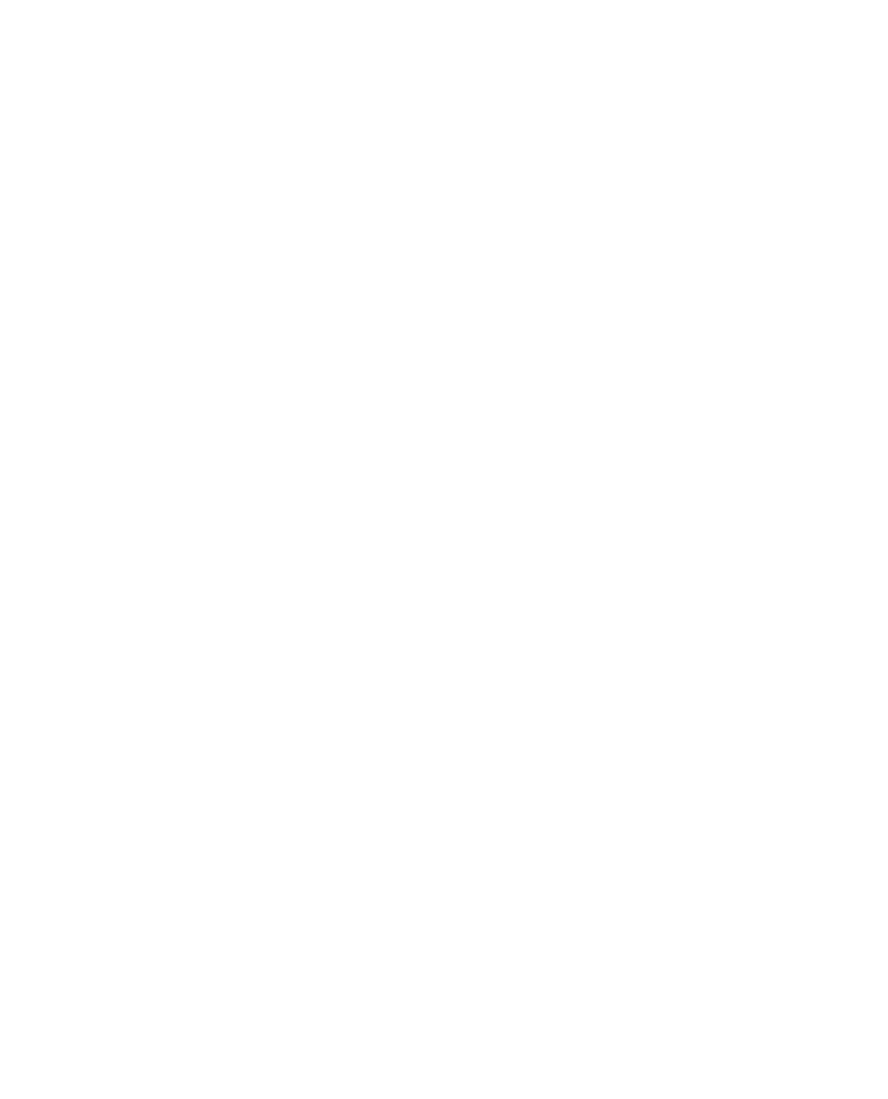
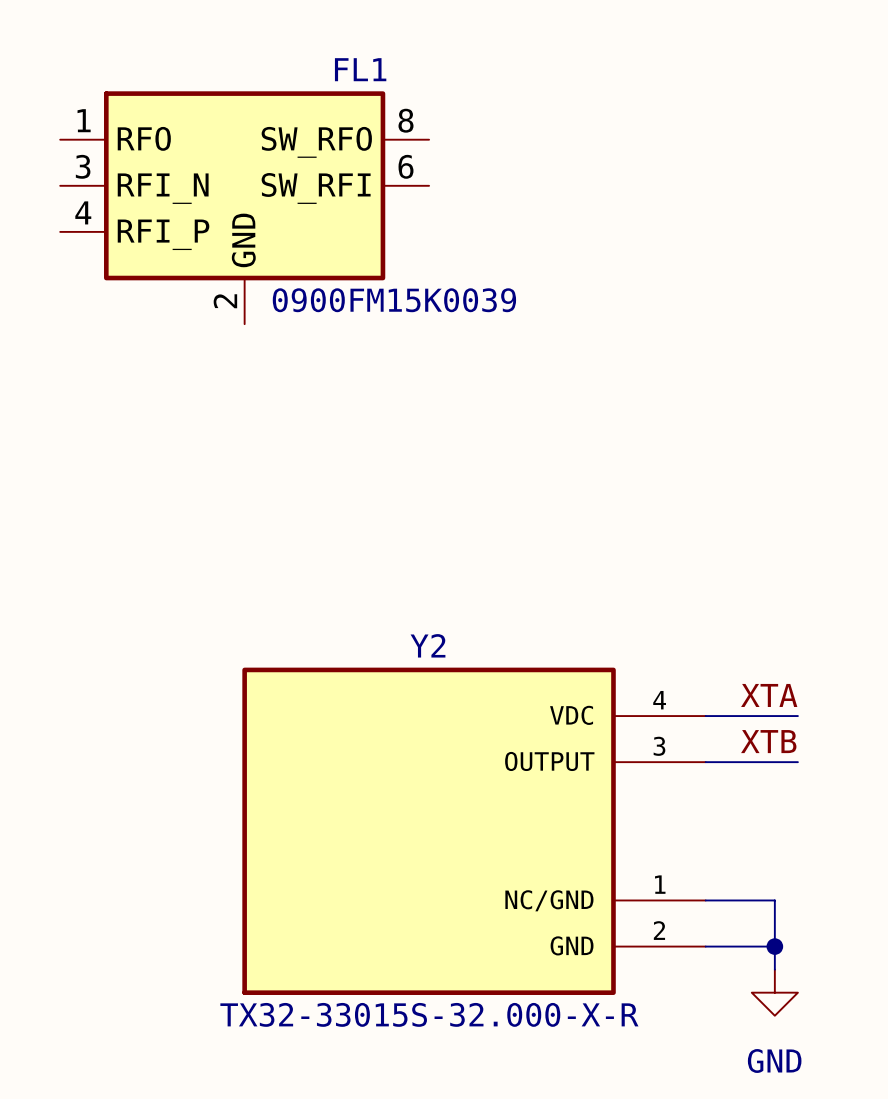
FL1: none -> 0900FM15K0039 (244, 207)
label: none -> XTA (769, 695)
wire: none -> (705, 716) (797, 716)
label: none -> XTB (768, 741)
wire: none -> (705, 762) (797, 762)
Y2: none -> TX32-33015S-32.000-X-R (474, 831)
wire: none -> (705, 900) (774, 900) (774, 969)
wire: none -> (705, 946) (774, 946)
junction: none -> (774, 946)
power symbol: none -> GND (774, 992)

